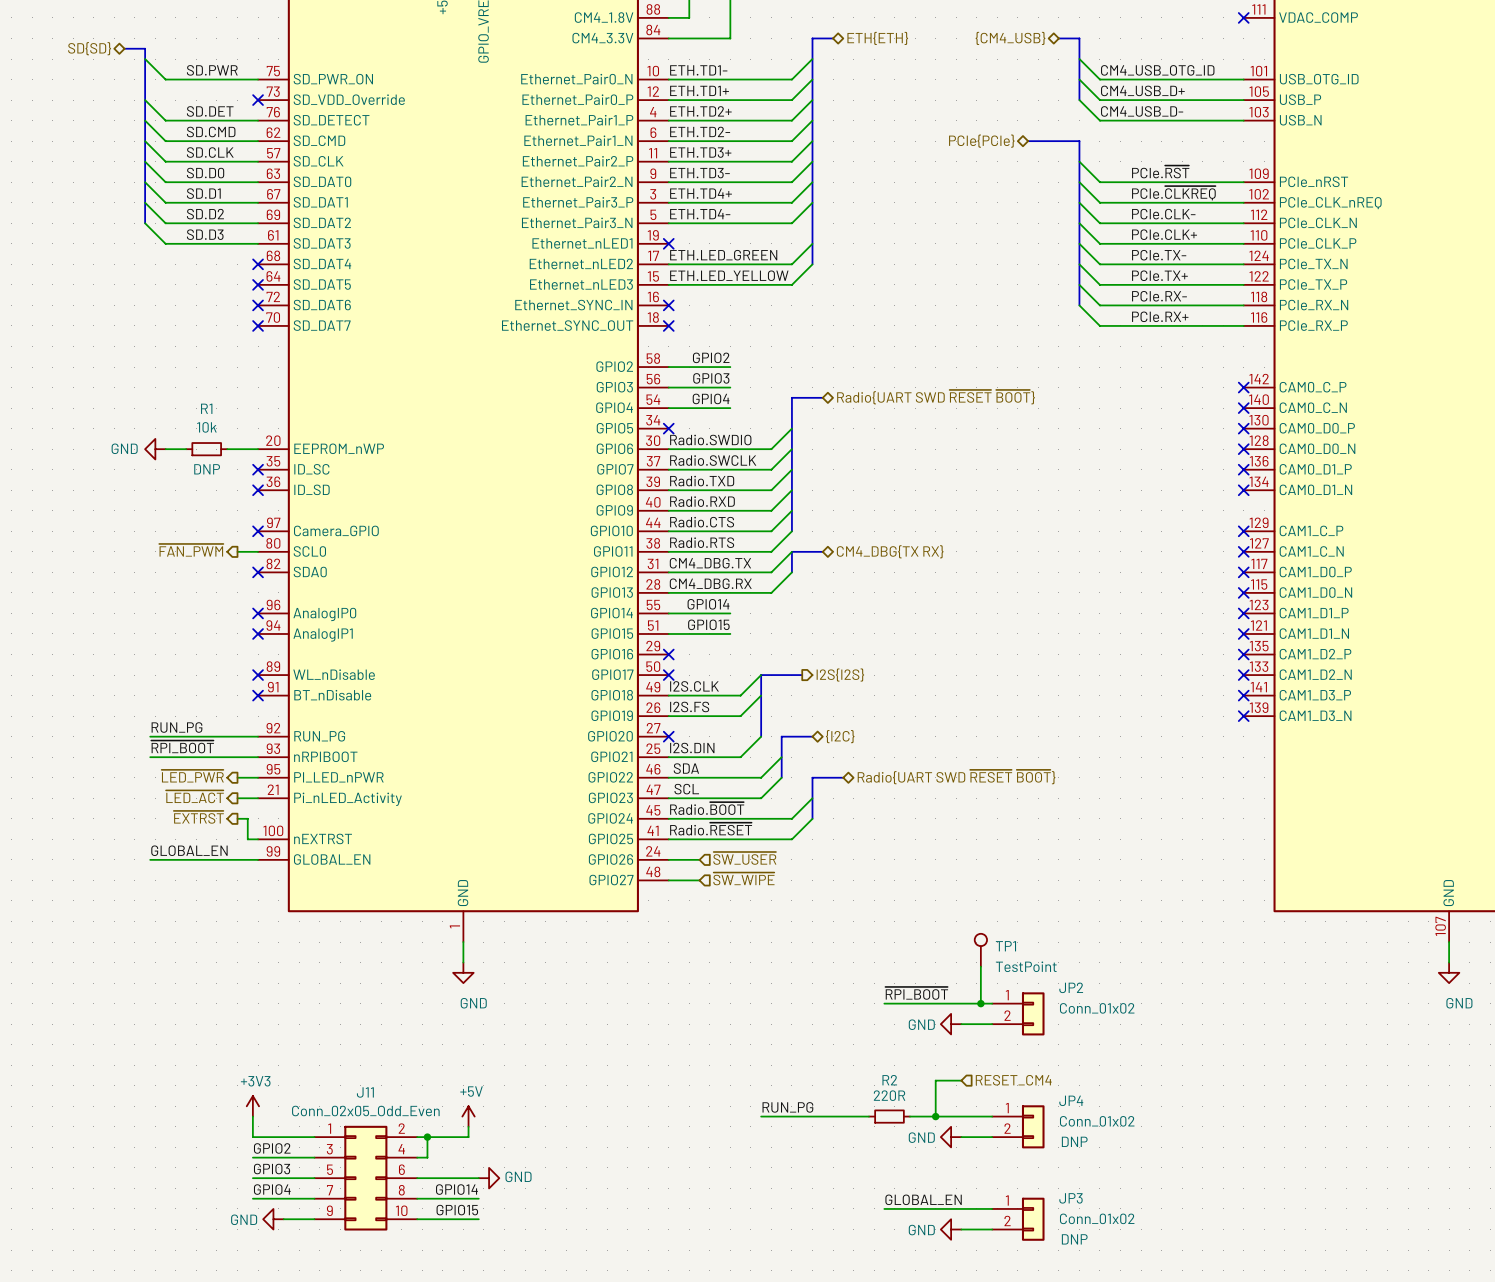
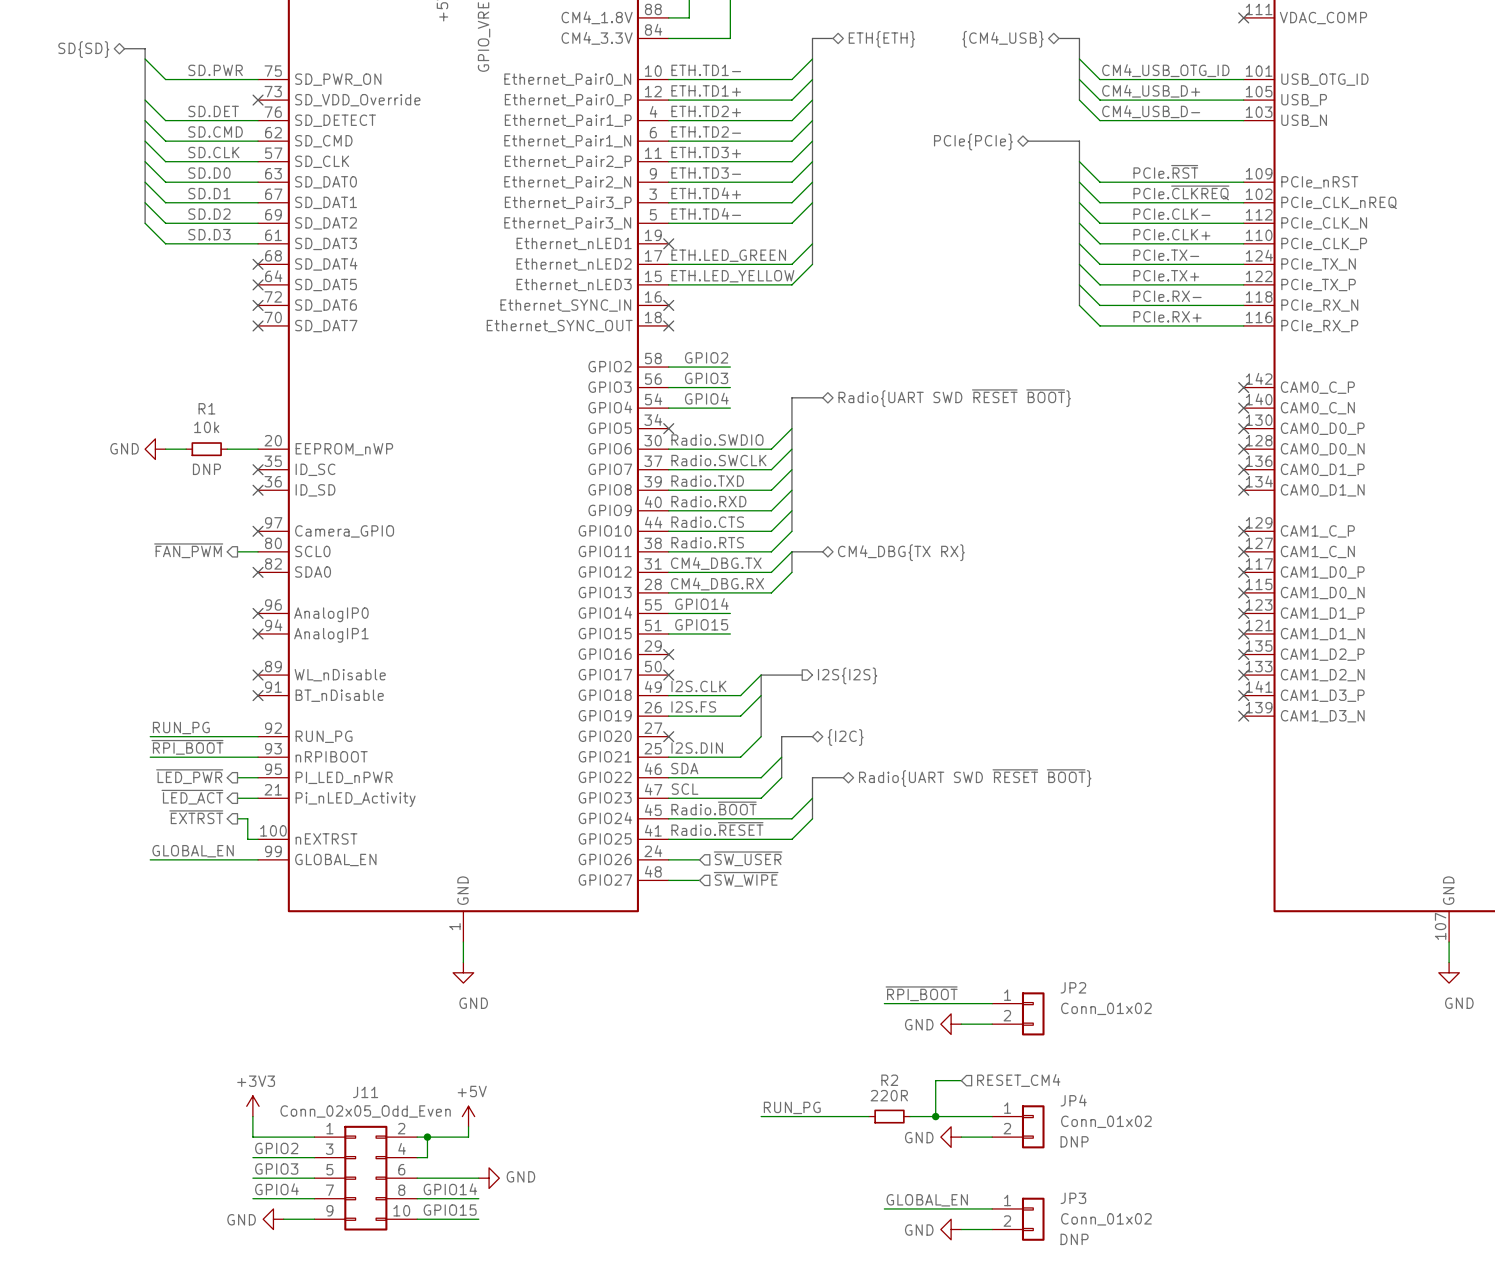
TP1: TestPoint (980, 950) -> none
wire: (980, 966) (980, 1003) -> none
junction: (980, 1003) -> none

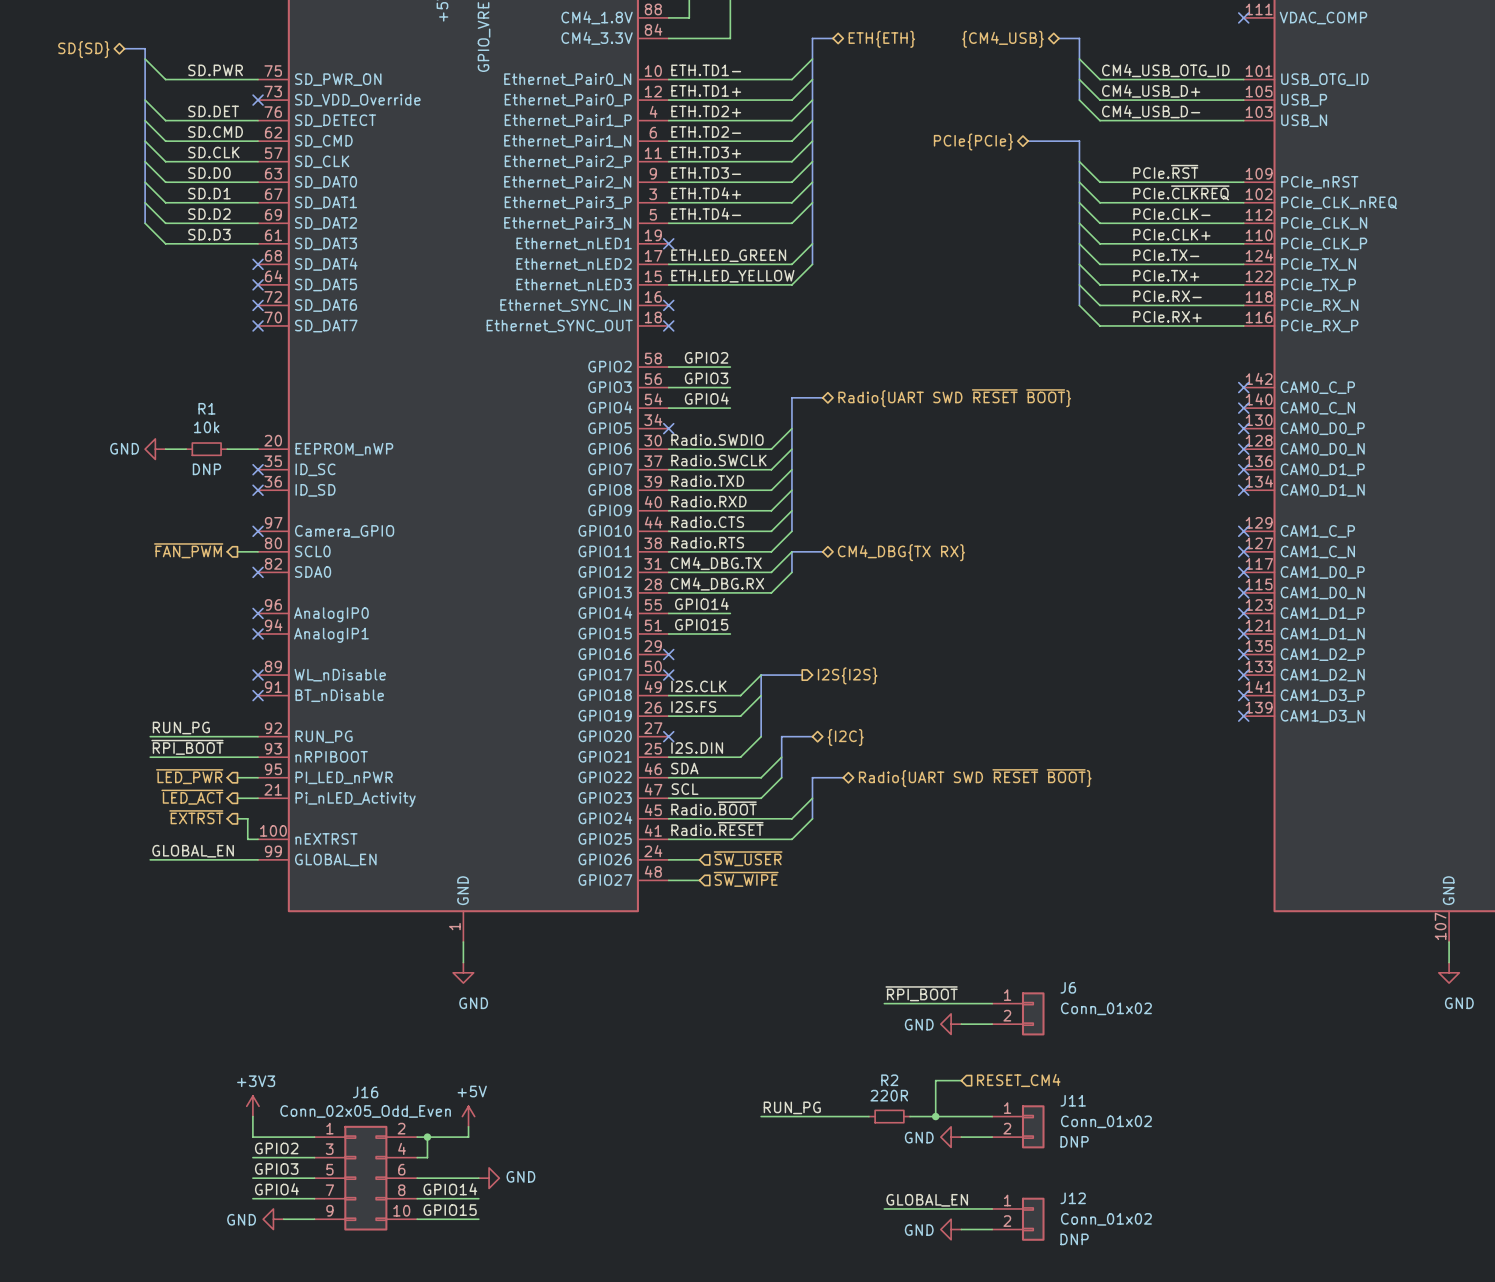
JP2 name: JP2 (1073, 987) -> J6 (1068, 987)
J11 name: J11 (365, 1092) -> J16 (365, 1092)
JP4 name: JP4 (1073, 1100) -> J11 (1073, 1100)
JP3 name: JP3 (1073, 1198) -> J12 (1073, 1198)

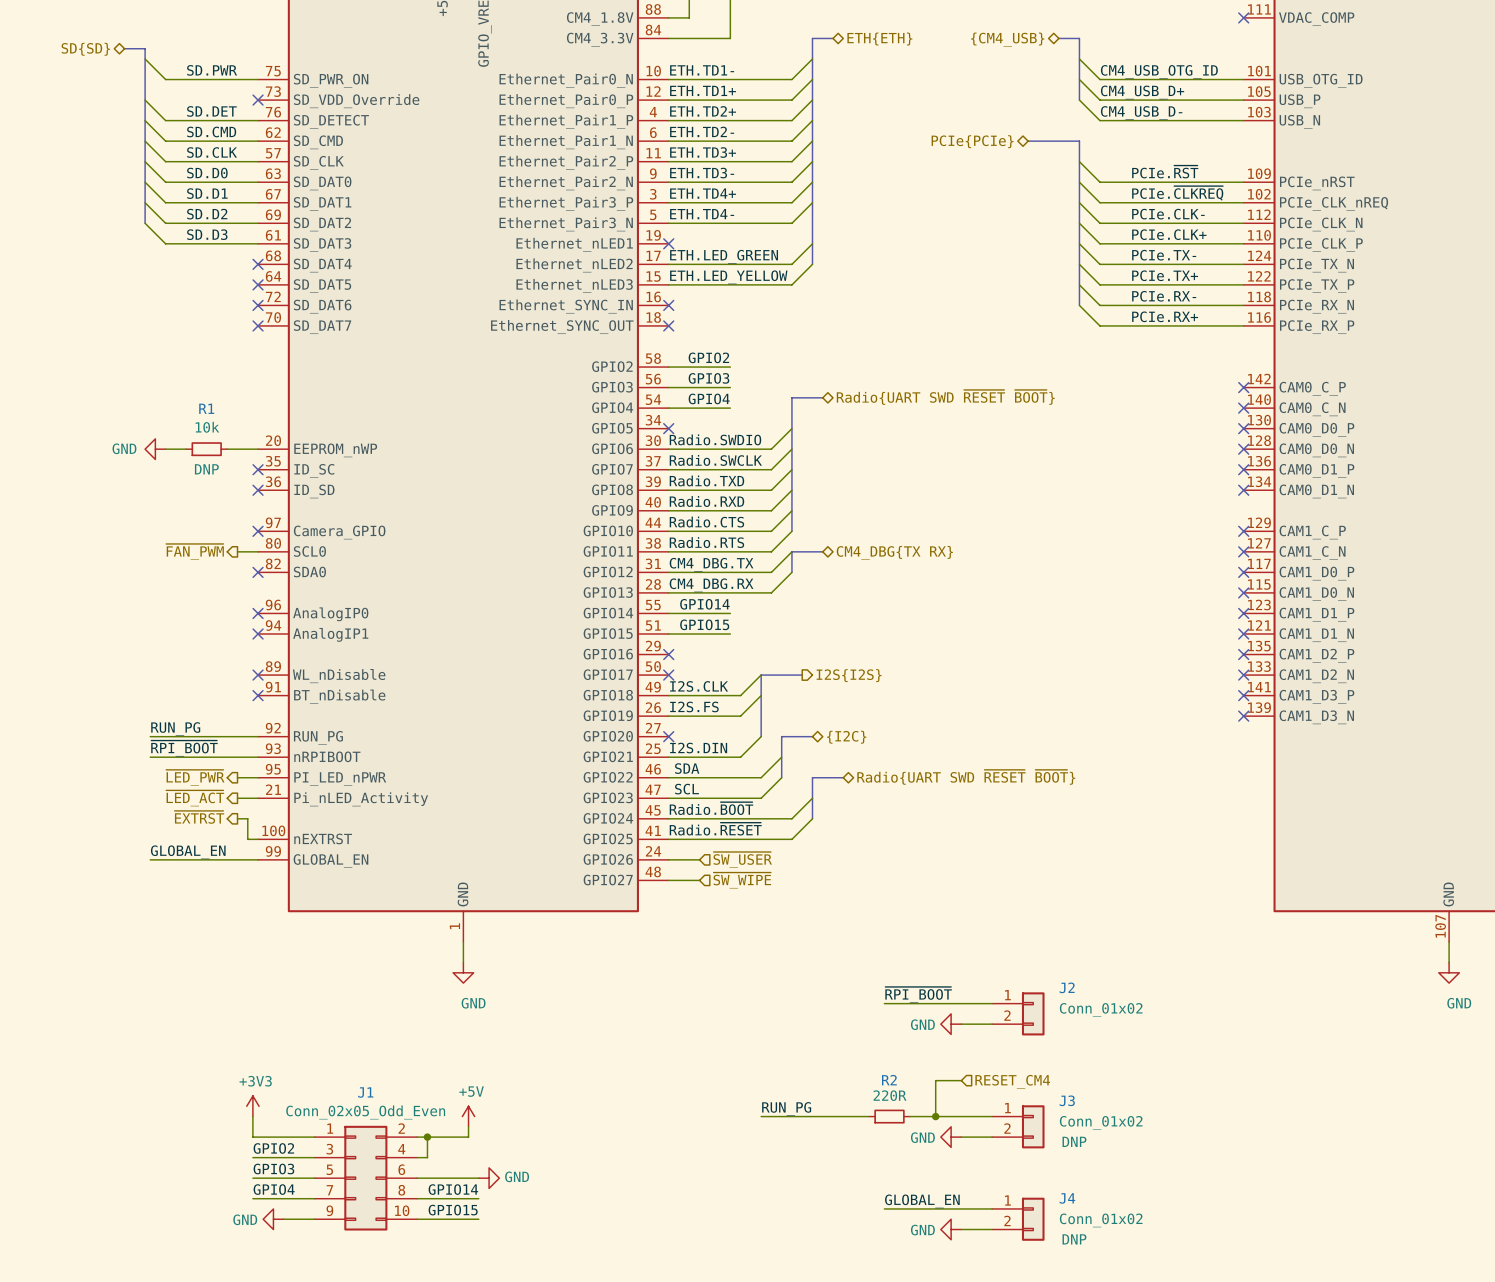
J6 name: J6 (1068, 987) -> J2 (1067, 987)
J16 name: J16 (365, 1092) -> J1 (365, 1092)
J11 name: J11 (1073, 1100) -> J3 (1067, 1100)
J12 name: J12 (1073, 1198) -> J4 (1067, 1198)

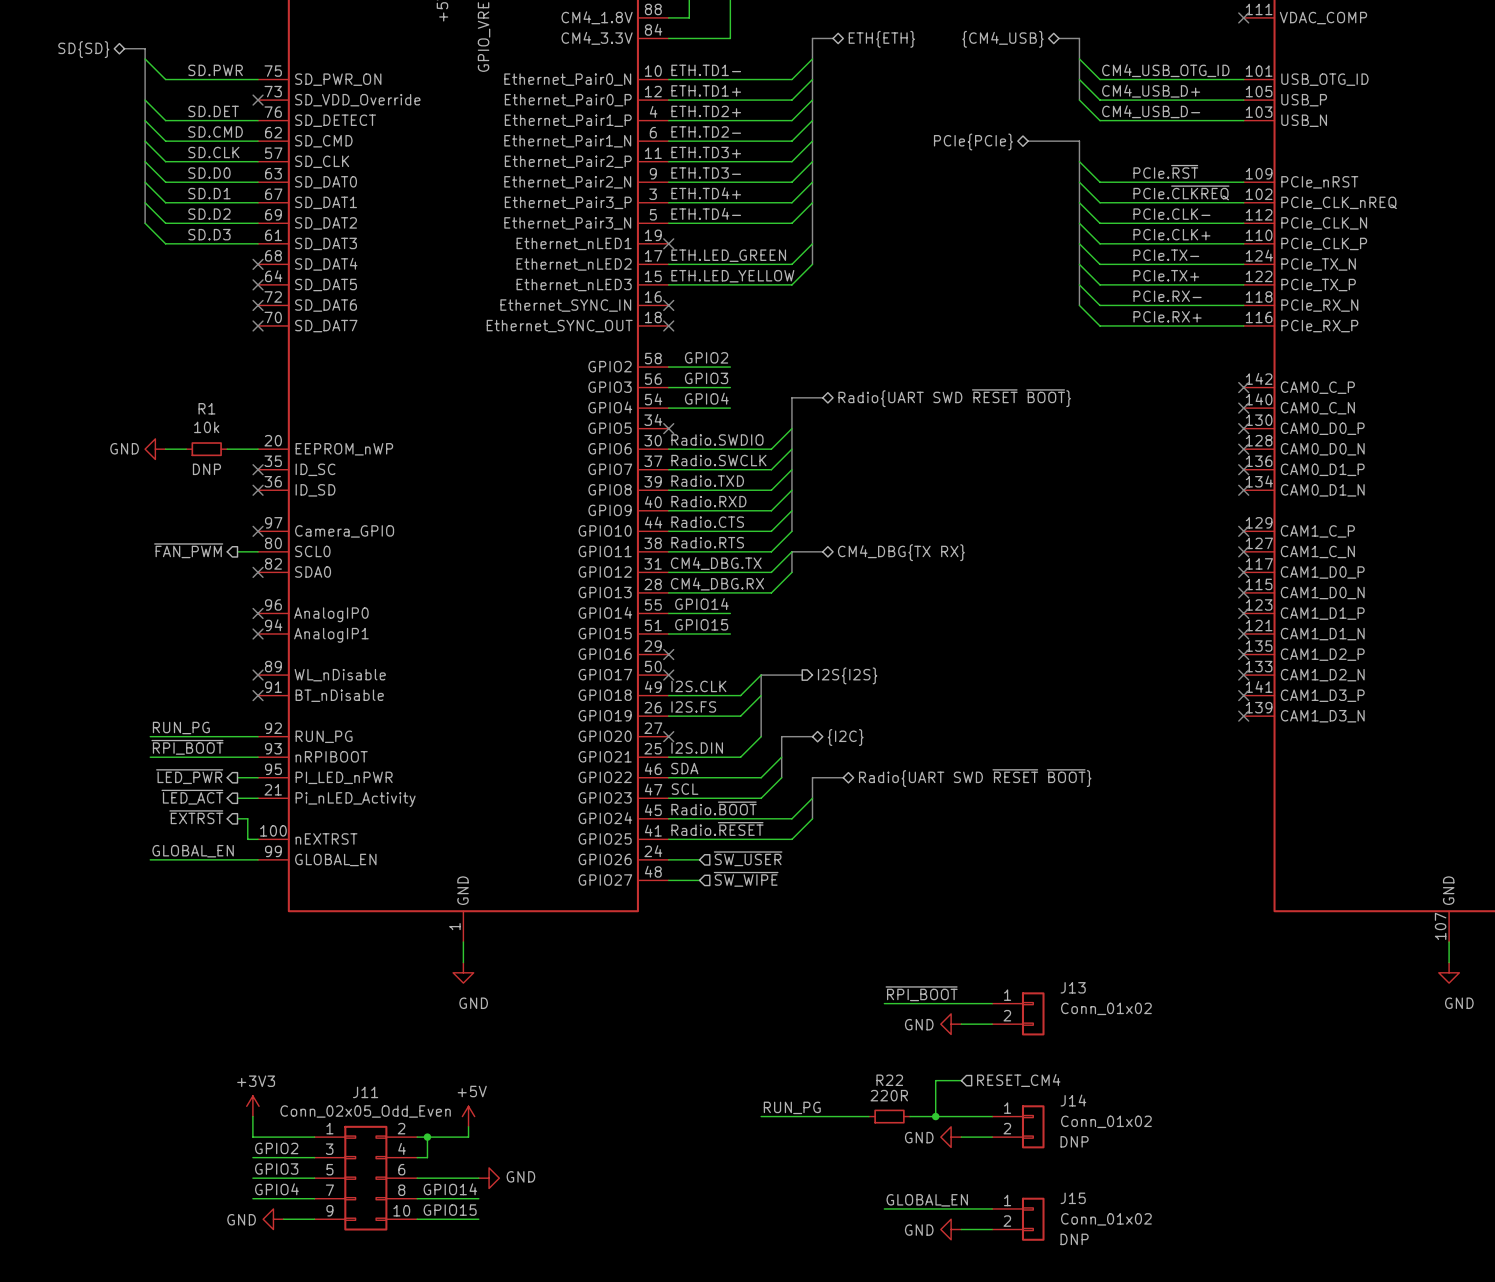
J2 name: J2 (1067, 987) -> J13 (1073, 987)
R2 name: R2 (889, 1080) -> R22 (889, 1080)
J1 name: J1 (365, 1092) -> J11 (365, 1092)
J3 name: J3 (1067, 1100) -> J14 (1073, 1100)
J4 name: J4 (1067, 1198) -> J15 (1073, 1198)

